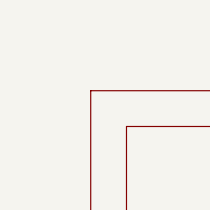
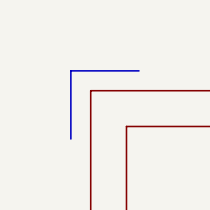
line: none -> (139, 70) (70, 70) (70, 139)

